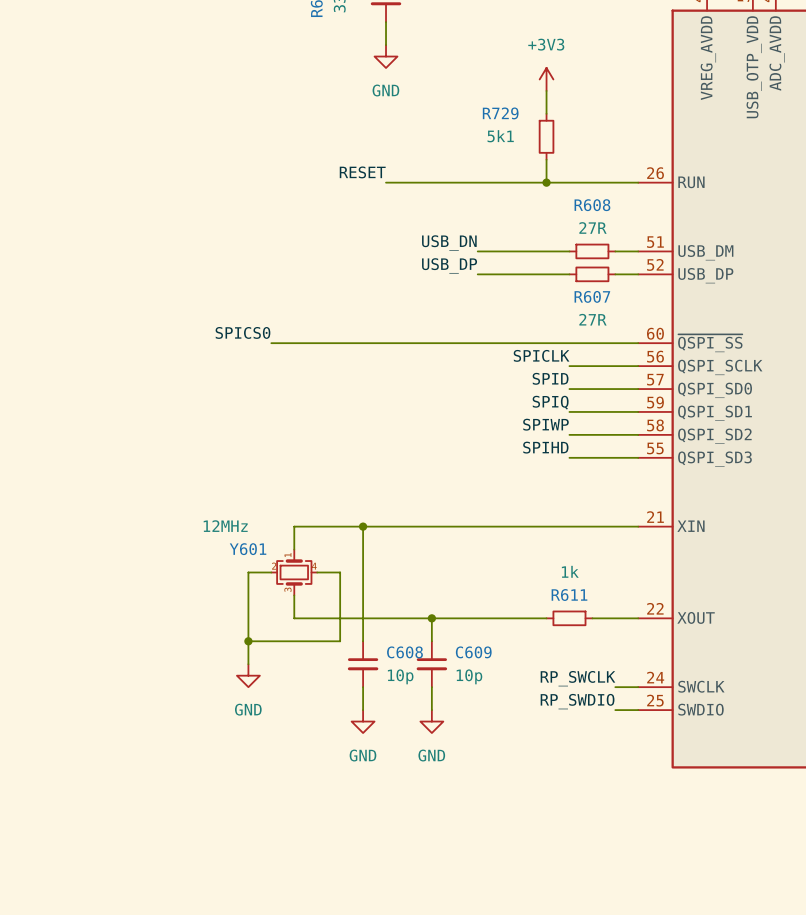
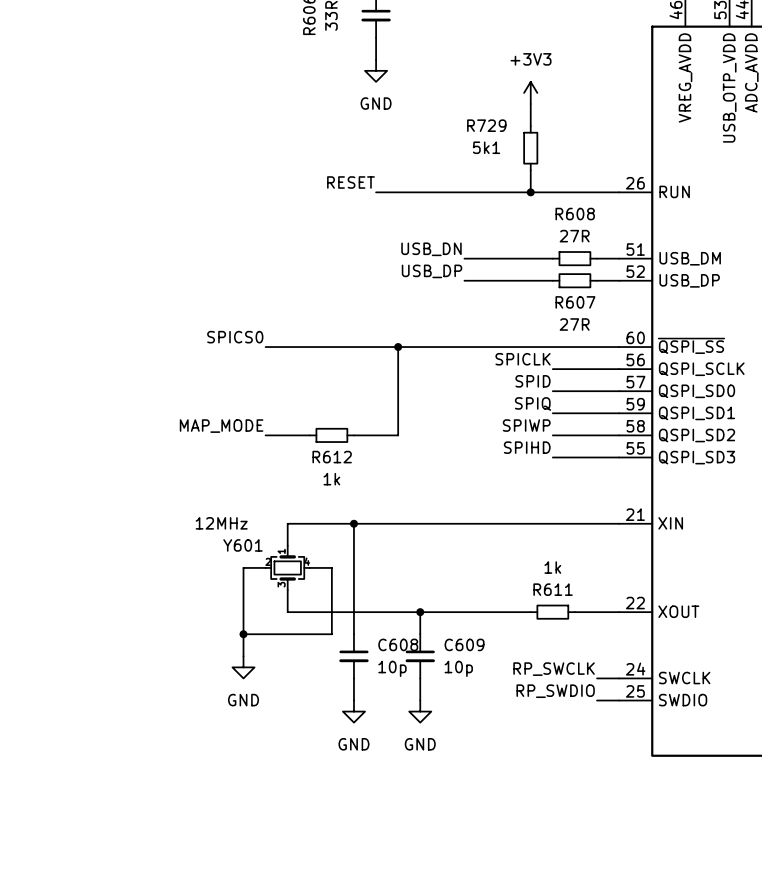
wire: none -> (398, 347) (398, 435) (353, 435)
junction: none -> (398, 347)
label: none -> MAP_MODE (221, 426)
wire: none -> (265, 435) (309, 435)
R612: none -> 1k (331, 435)

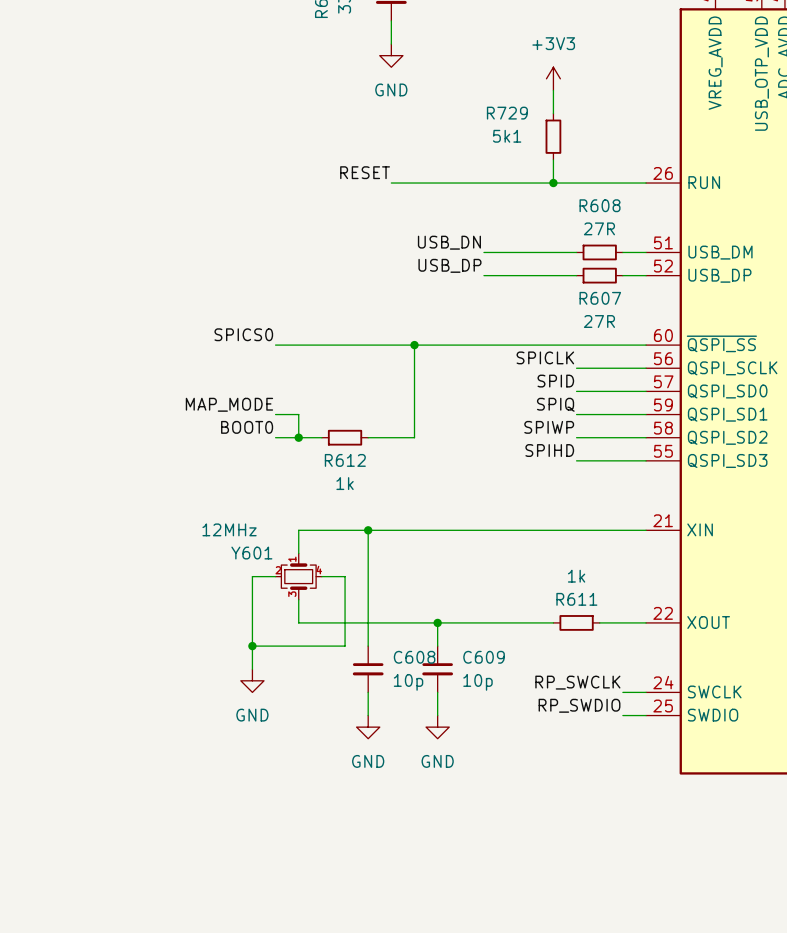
label: none -> MAP_MODE (229, 404)
wire: none -> (275, 414) (298, 414) (298, 437)
label: MAP_MODE (221, 426) -> BOOT0 (247, 427)
junction: none -> (298, 437)

